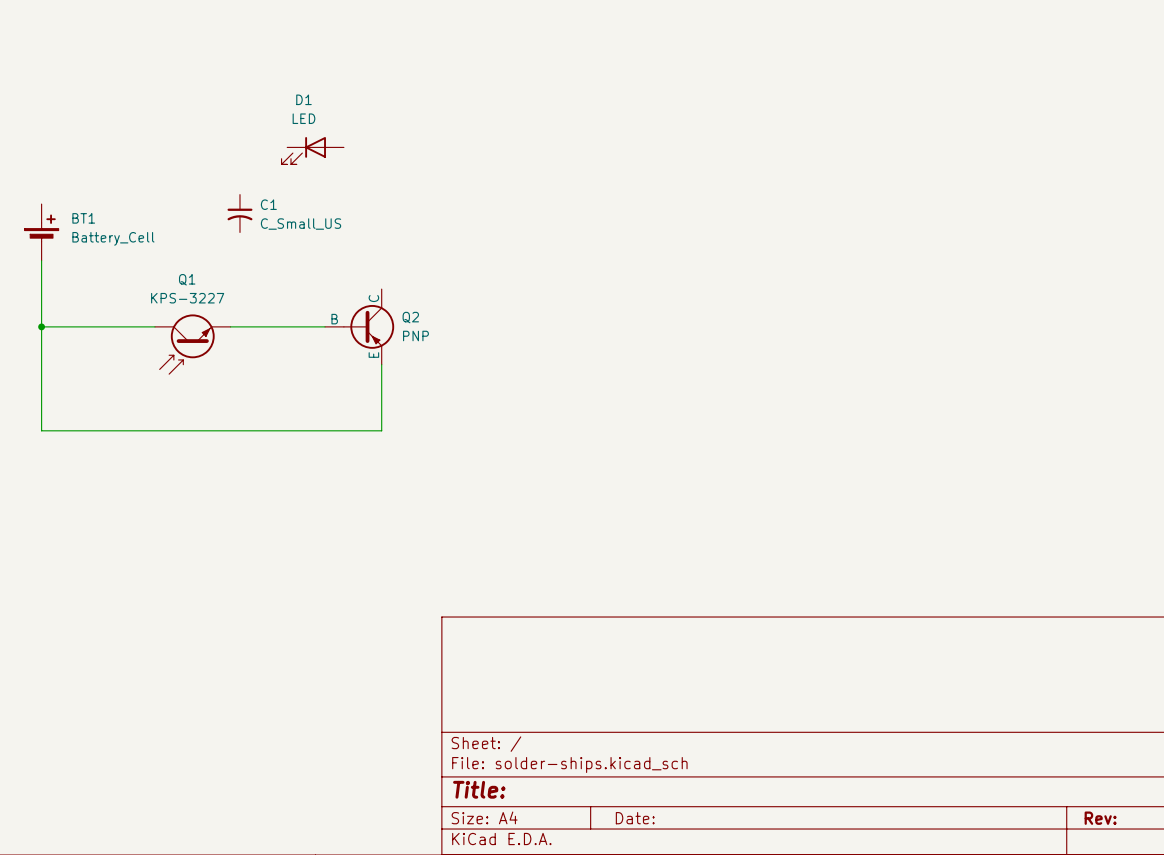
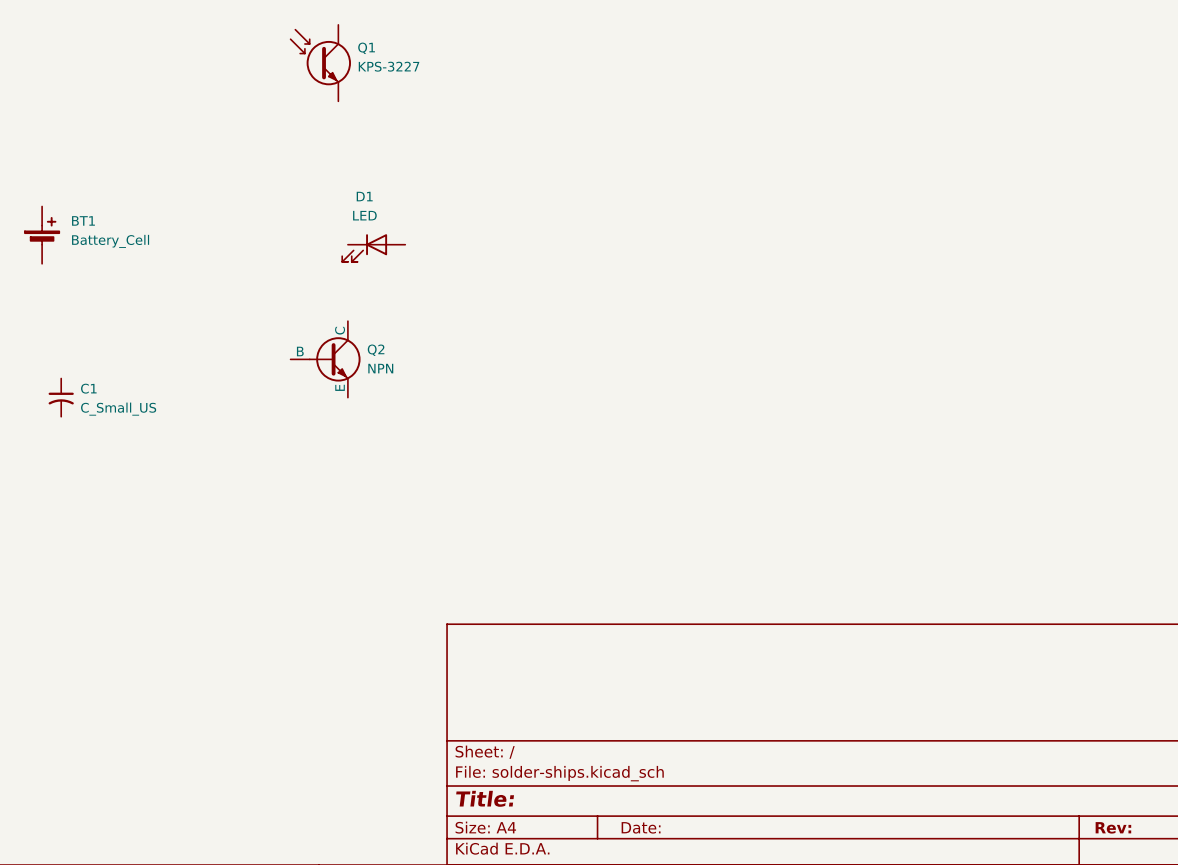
D1 position: (312, 150) -> (373, 248)
C1 position: (239, 213) -> (61, 397)
wire: (41, 260) (41, 430) (381, 430) (381, 364) -> none
Q1 name position: Q1 (187, 279) -> Q1 (366, 48)
Q2 symbol: [325, 289, 395, 365] -> [290, 321, 361, 398]
Q1 value position: KPS-3227 (187, 298) -> KPS-3227 (389, 66)
wire: (41, 326) (154, 326) -> none
junction: (41, 326) -> none
wire: (230, 326) (325, 326) -> none
Q2 value: PNP (415, 335) -> NPN (380, 368)
Q1 rotation: 0° (187, 344) -> 90° clockwise (320, 57)
Q1 position: (192, 344) -> (320, 63)

